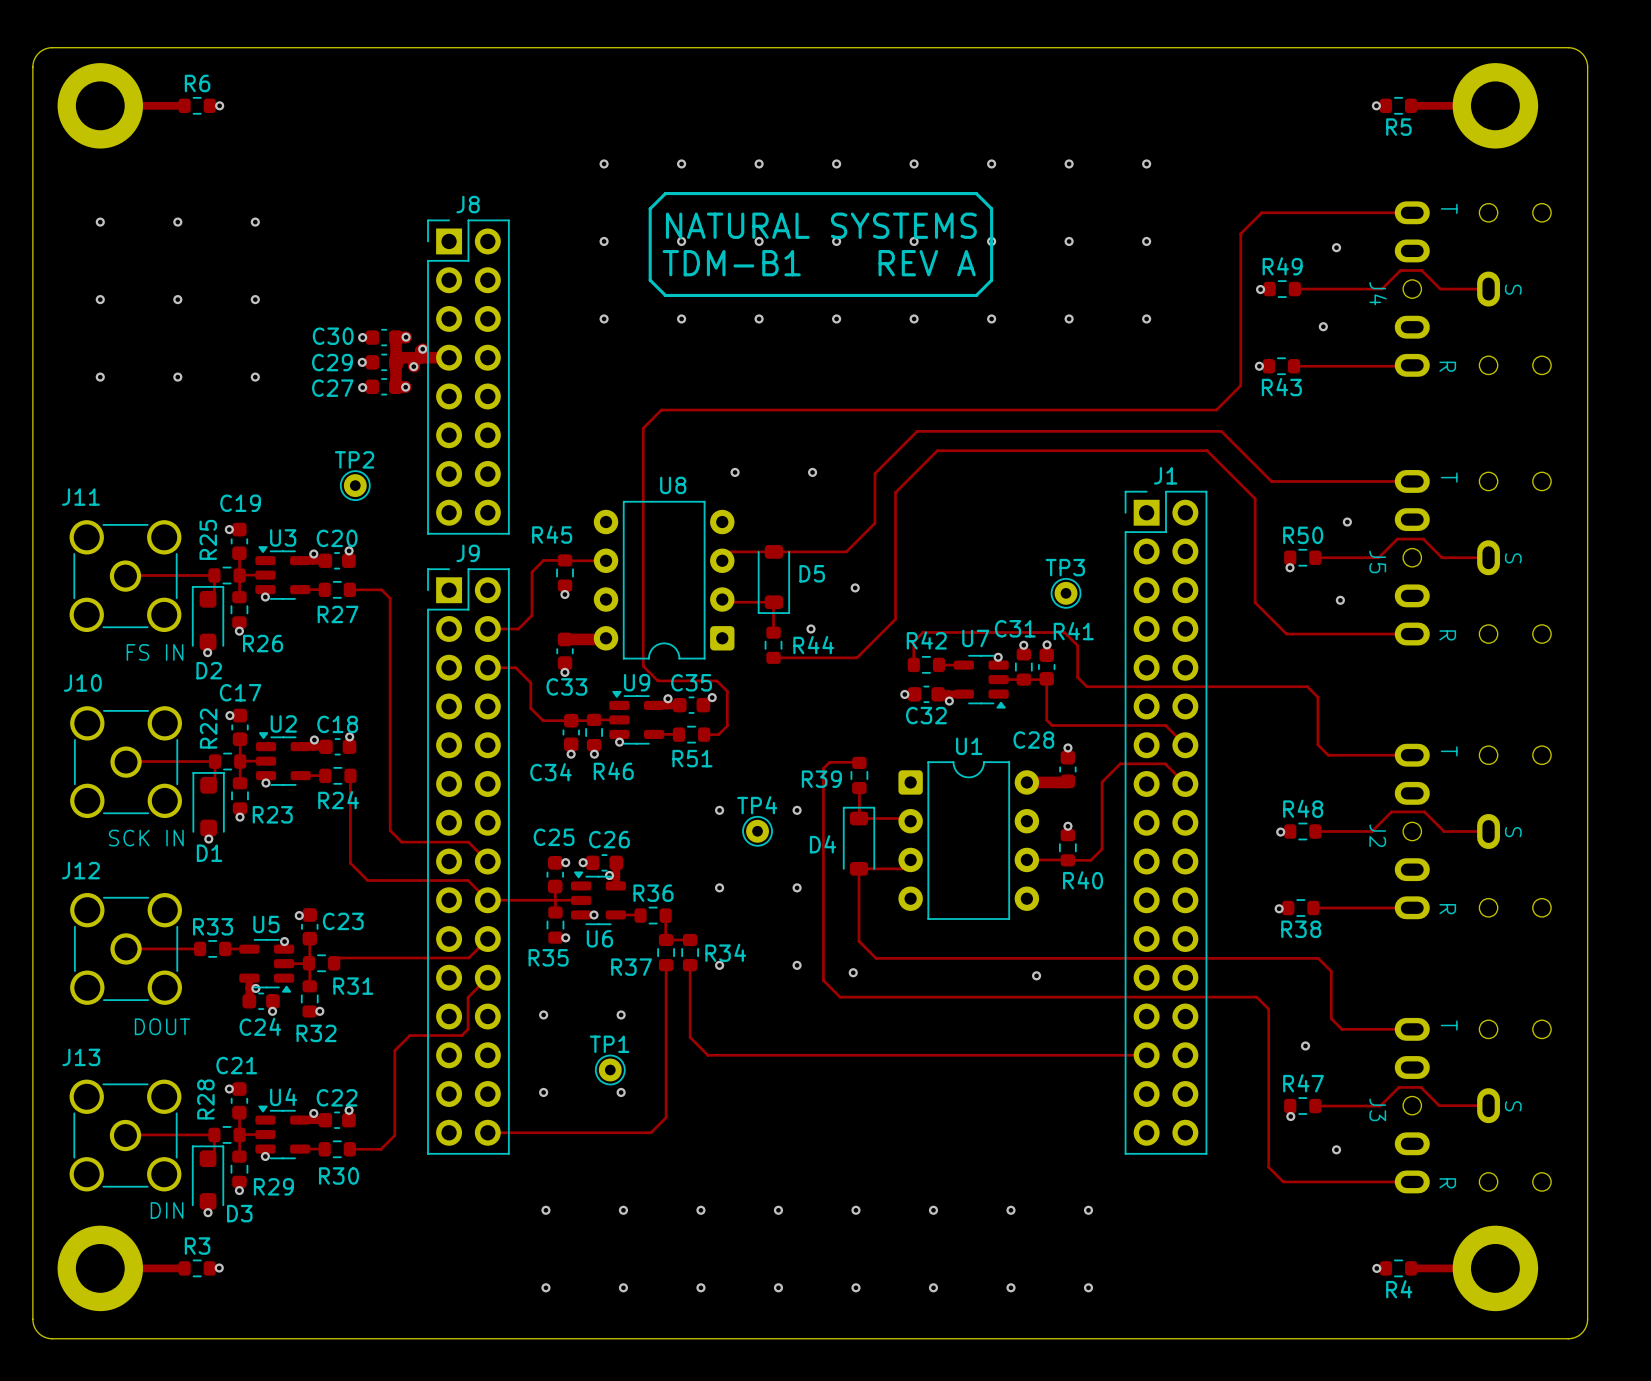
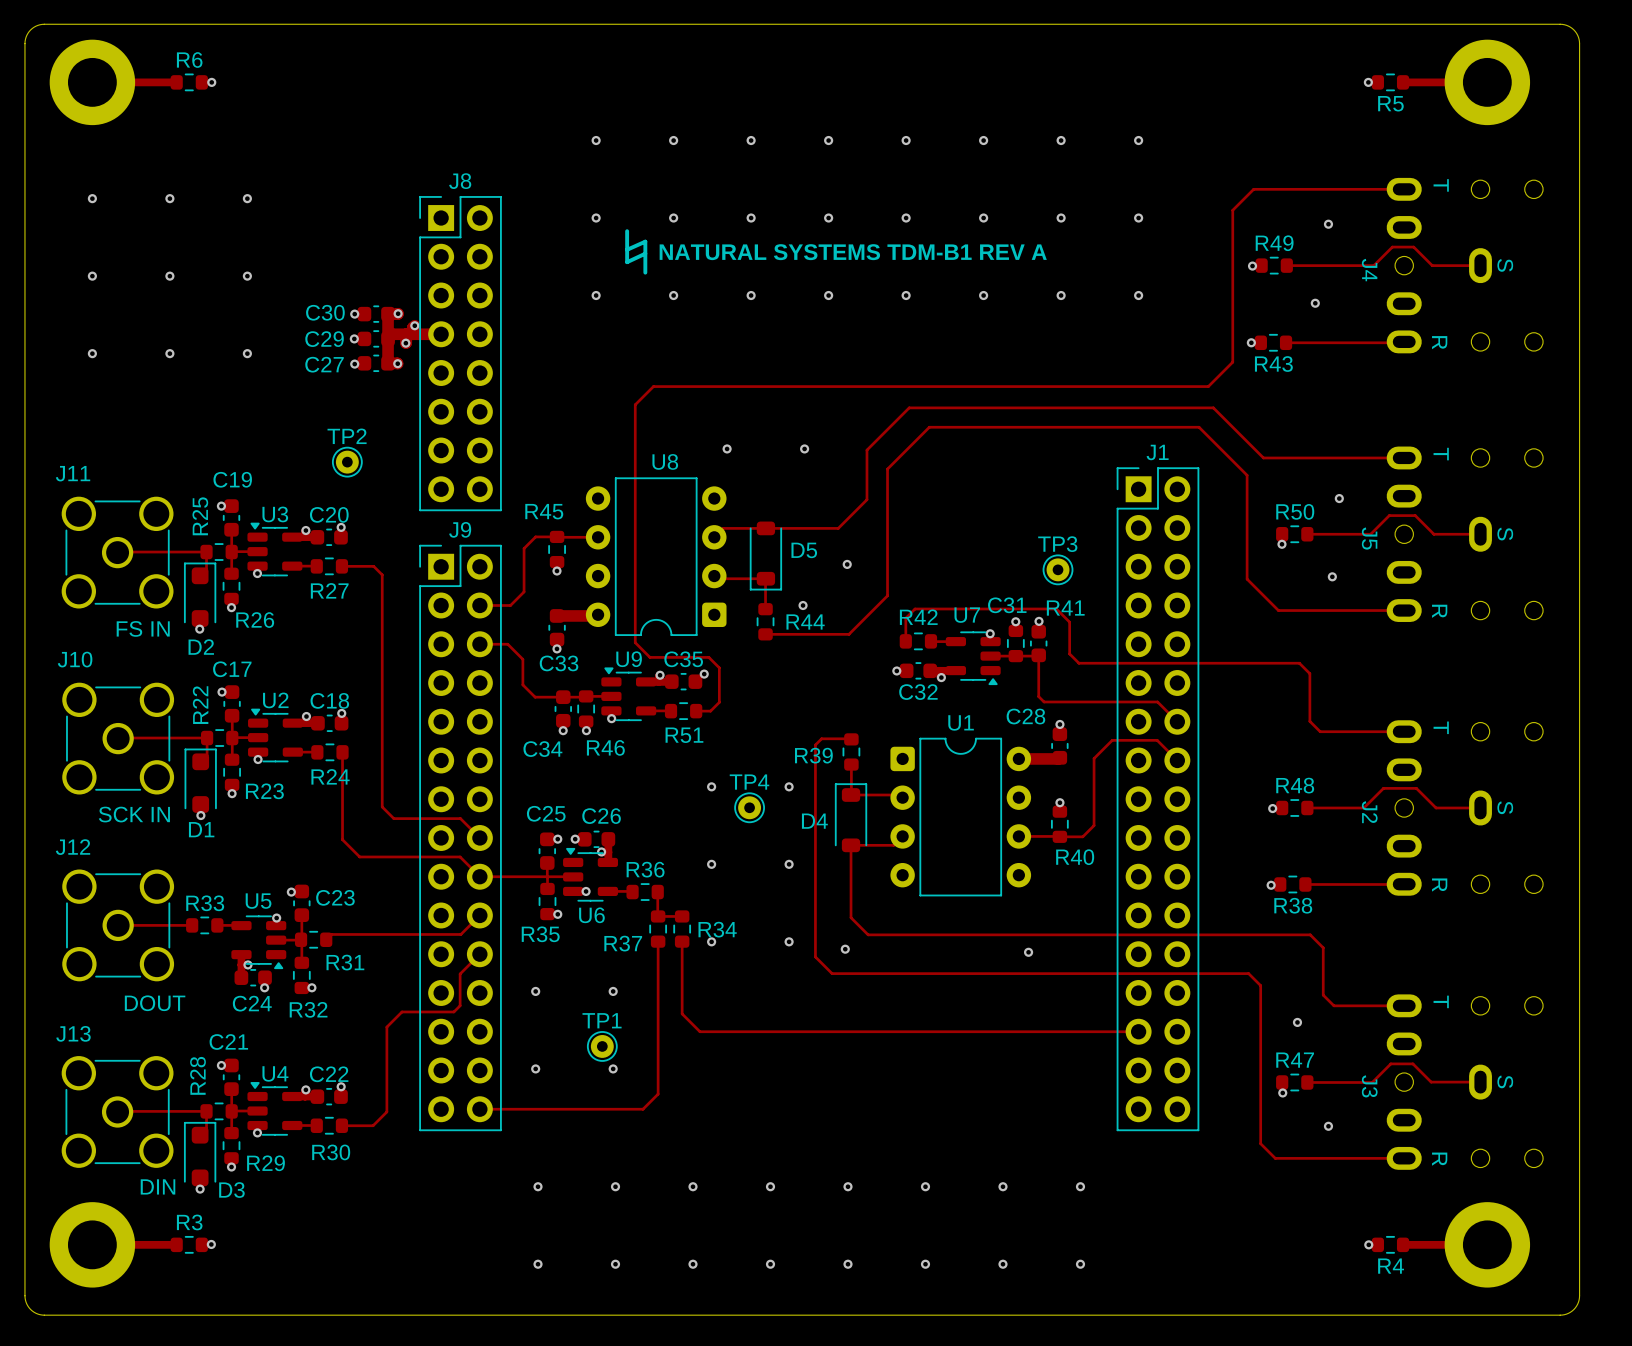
line: (665, 193) (650, 208) (650, 280) (665, 295) (976, 295) (991, 280) (991, 208) (976, 193) (665, 193) -> none
text: NATURAL SYSTEMS (821, 225) -> none
line: none -> (627, 231) (627, 262) (645, 253)
text: TDM-B1 REV A (819, 263) -> NATURAL SYSTEMS TDM-B1 REV A (853, 252)
line: none -> (627, 249) (645, 241) (645, 272)

